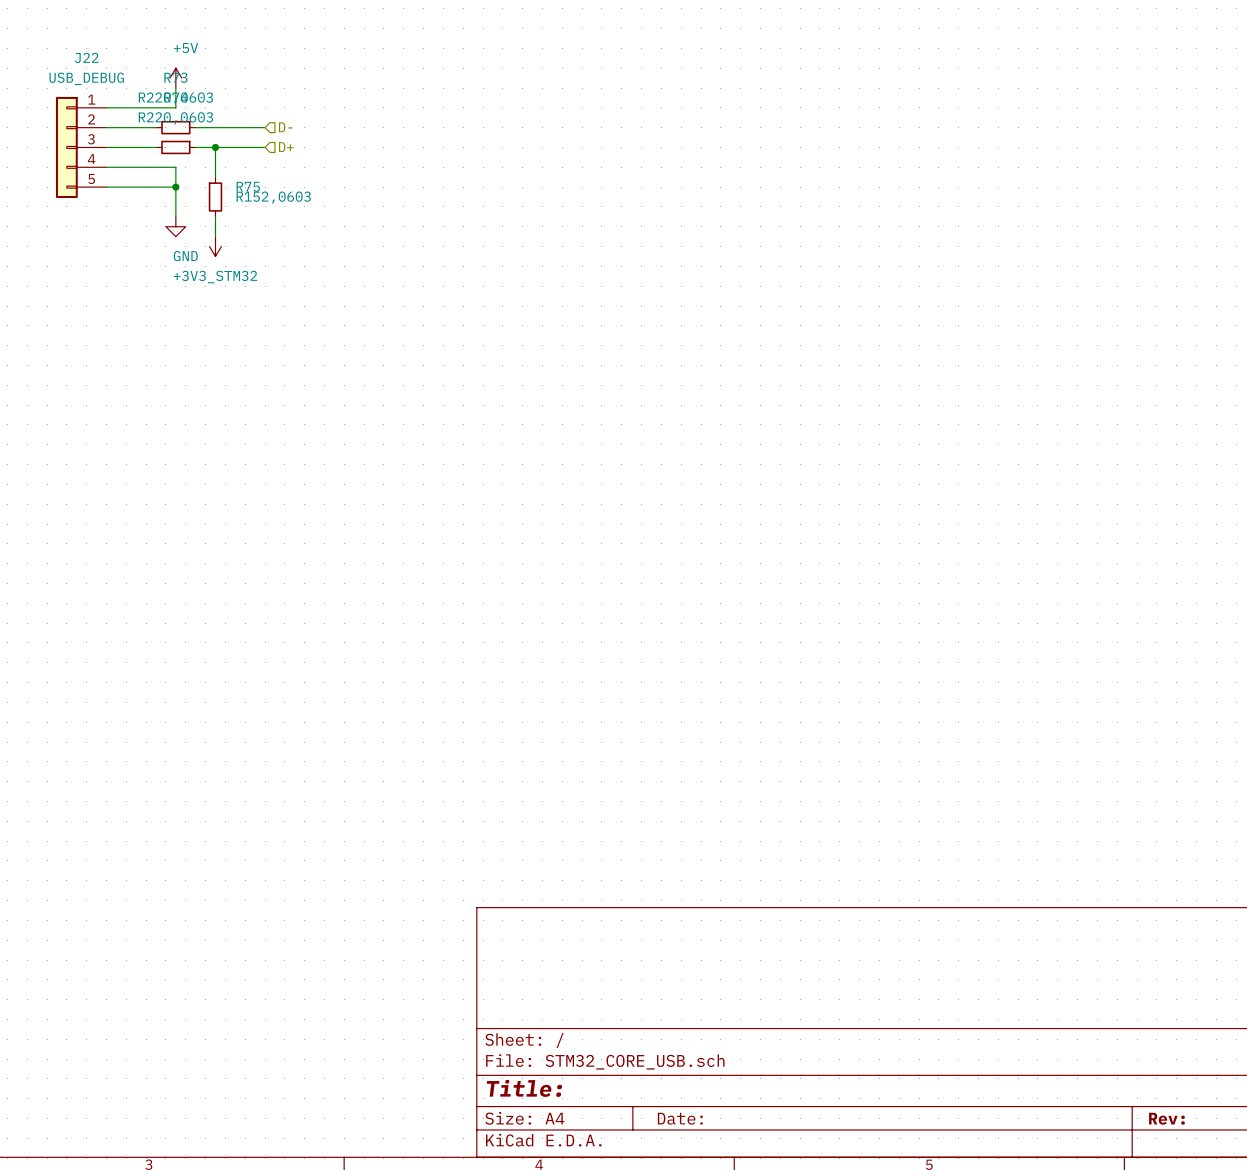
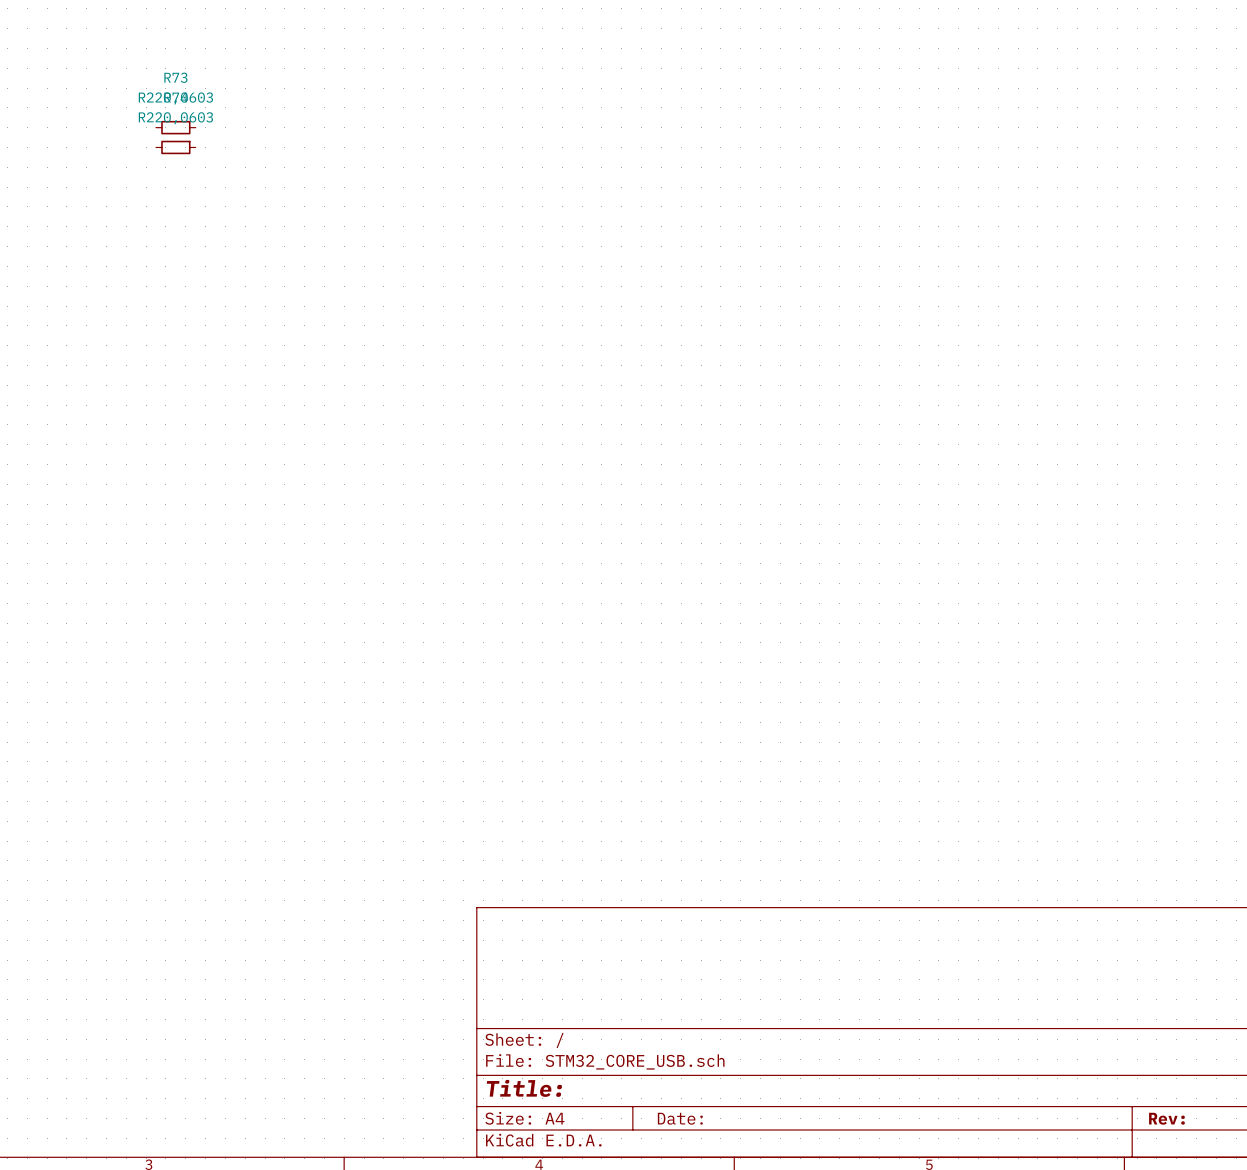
power symbol: +5V (175, 78) -> none
wire: (175, 88) (175, 107) (106, 107) -> none
wire: (106, 127) (156, 127) -> none
wire: (195, 127) (265, 127) -> none
hierarchical label: D- (285, 127) -> none
J22: USB_DEBUG (81, 147) -> none
wire: (106, 147) (156, 147) -> none
wire: (195, 147) (265, 147) -> none
wire: (215, 147) (215, 177) -> none
junction: (215, 147) -> none
hierarchical label: D+ (286, 147) -> none
wire: (106, 167) (175, 167) (175, 216) -> none
wire: (106, 187) (175, 187) -> none
junction: (175, 187) -> none
R75: R152,0603 (215, 197) -> none
wire: (215, 216) (215, 236) -> none
power symbol: GND (175, 226) -> none
power symbol: +3V3_STM32 (215, 246) -> none

